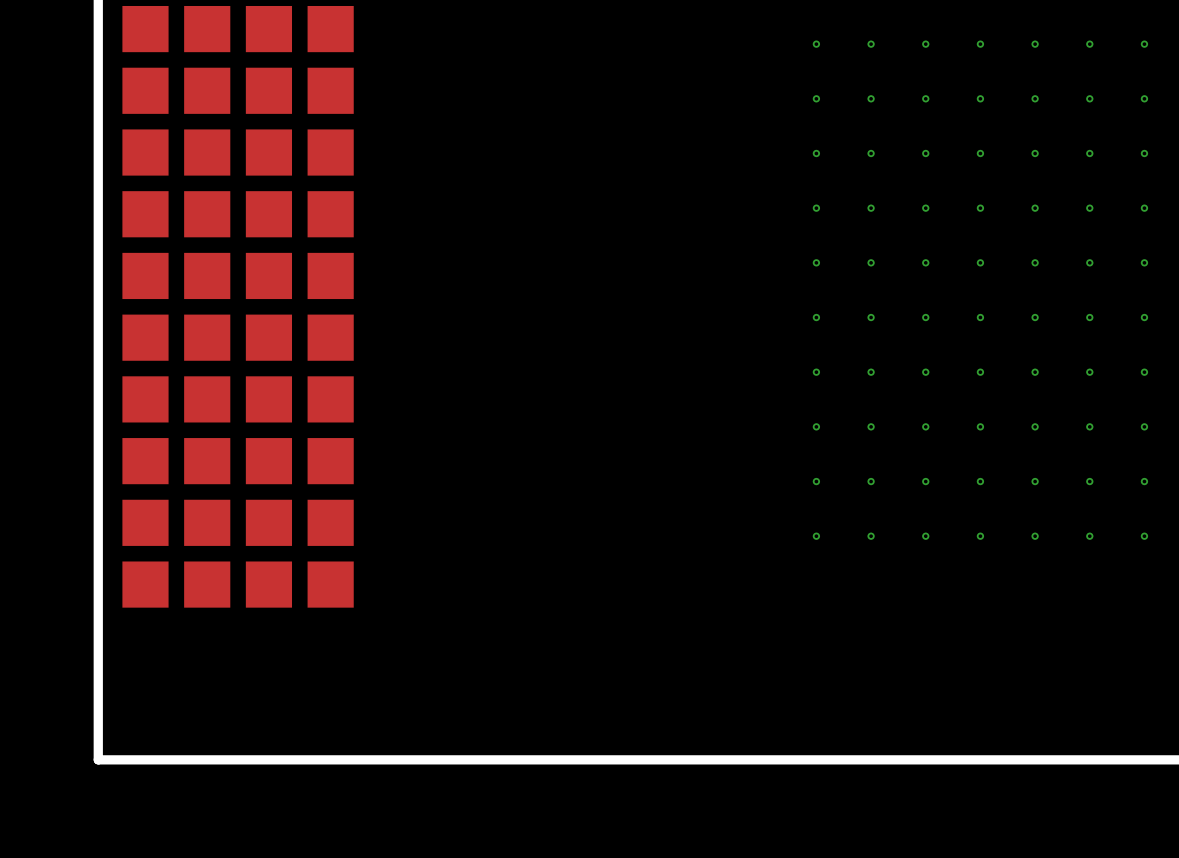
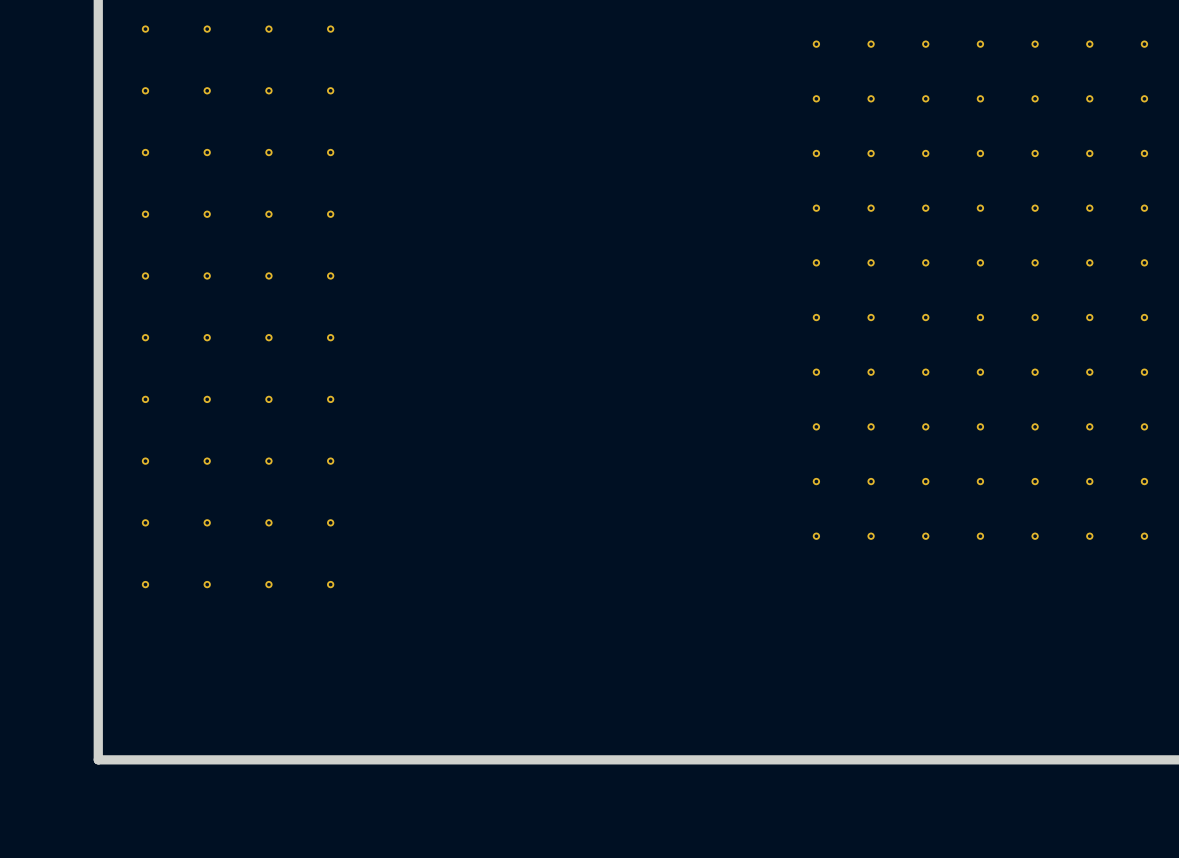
part footprint: [122, 5, 169, 53] -> [141, 25, 150, 33]
part footprint: [184, 5, 231, 53] -> [203, 25, 211, 33]
part footprint: [245, 5, 293, 53] -> [265, 25, 273, 33]
part footprint: [307, 5, 354, 53] -> [327, 25, 335, 33]
part footprint: [122, 67, 169, 114] -> [141, 87, 150, 95]
part footprint: [184, 67, 231, 114] -> [203, 87, 211, 95]
part footprint: [245, 67, 293, 114] -> [265, 87, 273, 95]
part footprint: [307, 67, 354, 114] -> [327, 87, 335, 95]
part footprint: [122, 129, 169, 176] -> [141, 148, 150, 157]
part footprint: [184, 129, 231, 176] -> [203, 148, 211, 157]
part footprint: [245, 129, 293, 176] -> [265, 148, 273, 157]
part footprint: [307, 129, 354, 176] -> [327, 148, 335, 157]
part footprint: [122, 191, 169, 238] -> [141, 210, 150, 218]
part footprint: [184, 191, 231, 238] -> [203, 210, 211, 218]
part footprint: [245, 191, 293, 238] -> [265, 210, 273, 218]
part footprint: [307, 191, 354, 238] -> [327, 210, 335, 218]
part footprint: [122, 252, 169, 300] -> [141, 272, 150, 280]
part footprint: [184, 252, 231, 300] -> [203, 272, 211, 280]
part footprint: [245, 252, 293, 300] -> [265, 272, 273, 280]
part footprint: [307, 252, 354, 300] -> [327, 272, 335, 280]
part footprint: [122, 314, 169, 361] -> [141, 334, 150, 342]
part footprint: [184, 314, 231, 361] -> [203, 334, 211, 342]
part footprint: [245, 314, 293, 361] -> [265, 334, 273, 342]
part footprint: [307, 314, 354, 361] -> [327, 334, 335, 342]
part footprint: [122, 376, 169, 423] -> [141, 395, 150, 404]
part footprint: [184, 376, 231, 423] -> [203, 395, 211, 404]
part footprint: [245, 376, 293, 423] -> [265, 395, 273, 404]
part footprint: [307, 376, 354, 423] -> [327, 395, 335, 404]
part footprint: [122, 438, 169, 485] -> [141, 457, 150, 465]
part footprint: [184, 438, 231, 485] -> [203, 457, 211, 465]
part footprint: [245, 438, 293, 485] -> [265, 457, 273, 465]
part footprint: [307, 438, 354, 485] -> [327, 457, 335, 465]
part footprint: [122, 499, 169, 546] -> [141, 519, 150, 527]
part footprint: [184, 499, 231, 546] -> [203, 519, 211, 527]
part footprint: [245, 499, 293, 546] -> [265, 519, 273, 527]
part footprint: [307, 499, 354, 546] -> [327, 519, 335, 527]
part footprint: [122, 561, 169, 608] -> [141, 580, 150, 589]
part footprint: [184, 561, 231, 608] -> [203, 580, 211, 589]
part footprint: [245, 561, 293, 608] -> [265, 580, 273, 589]
part footprint: [307, 561, 354, 608] -> [327, 580, 335, 589]

